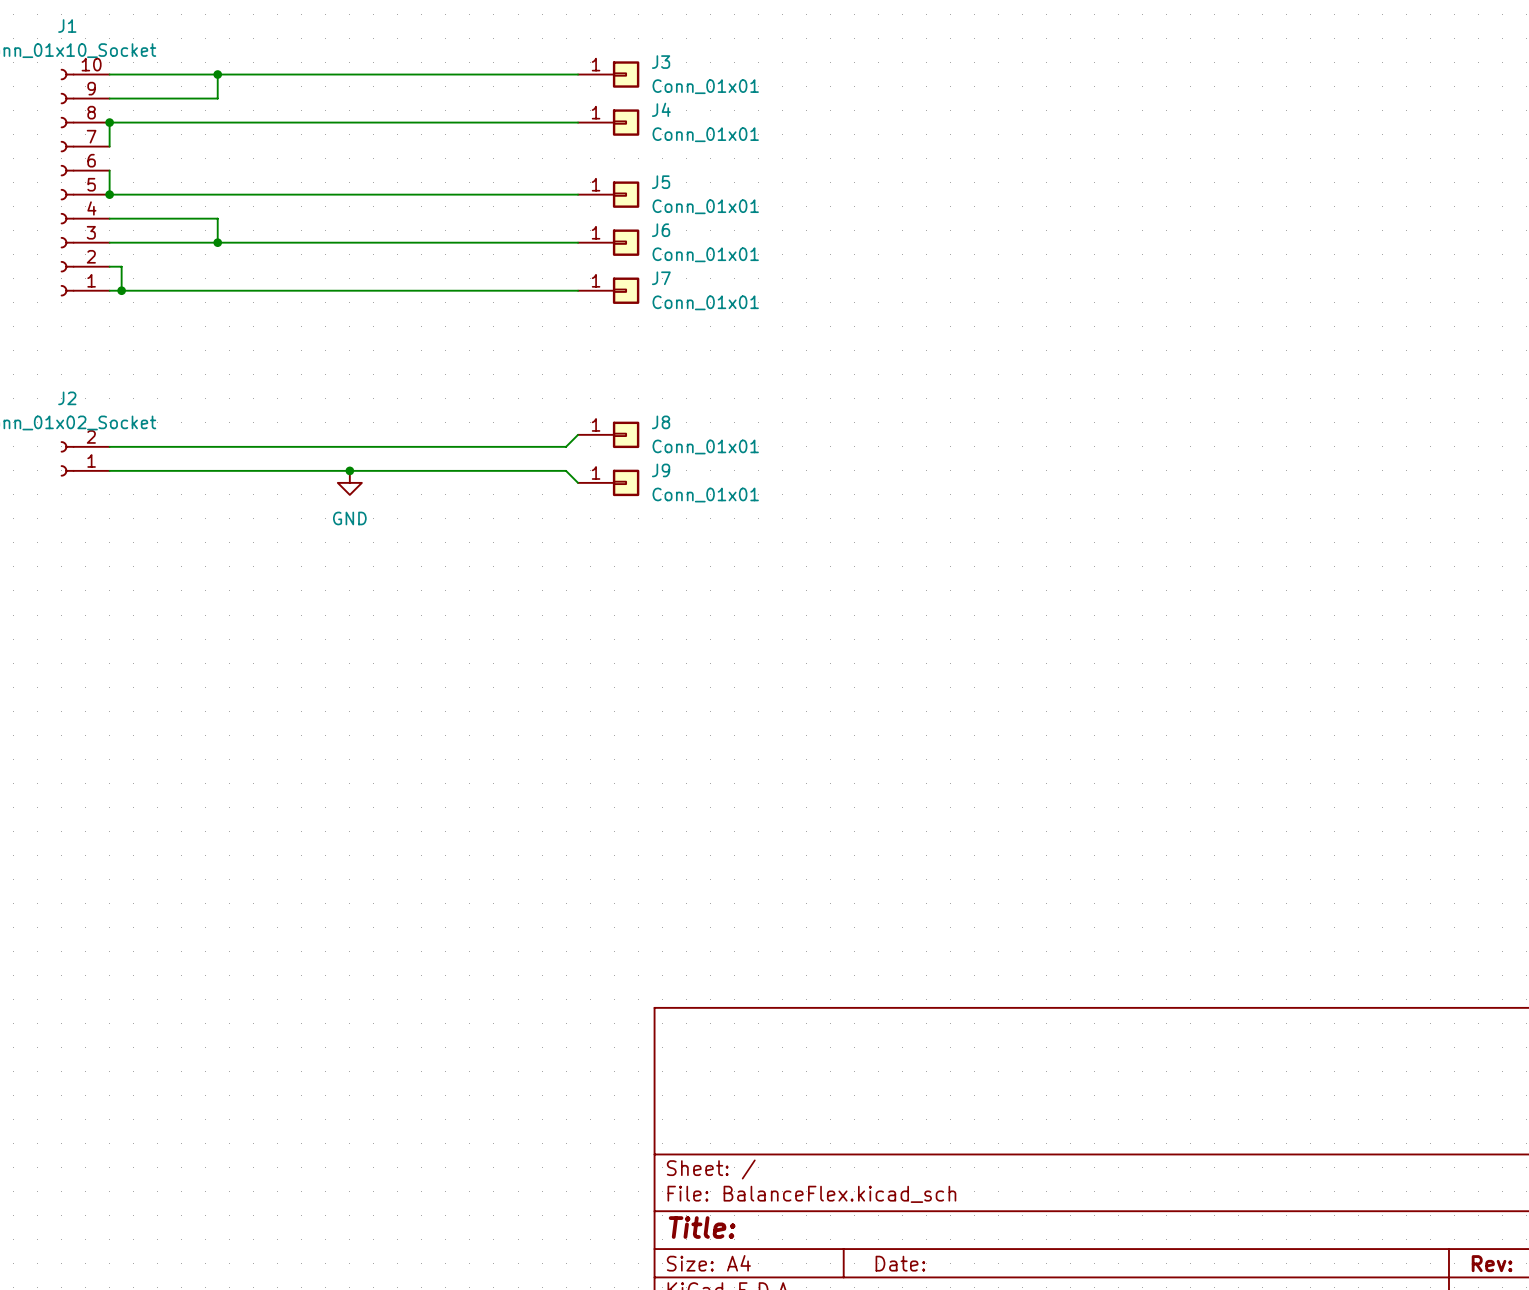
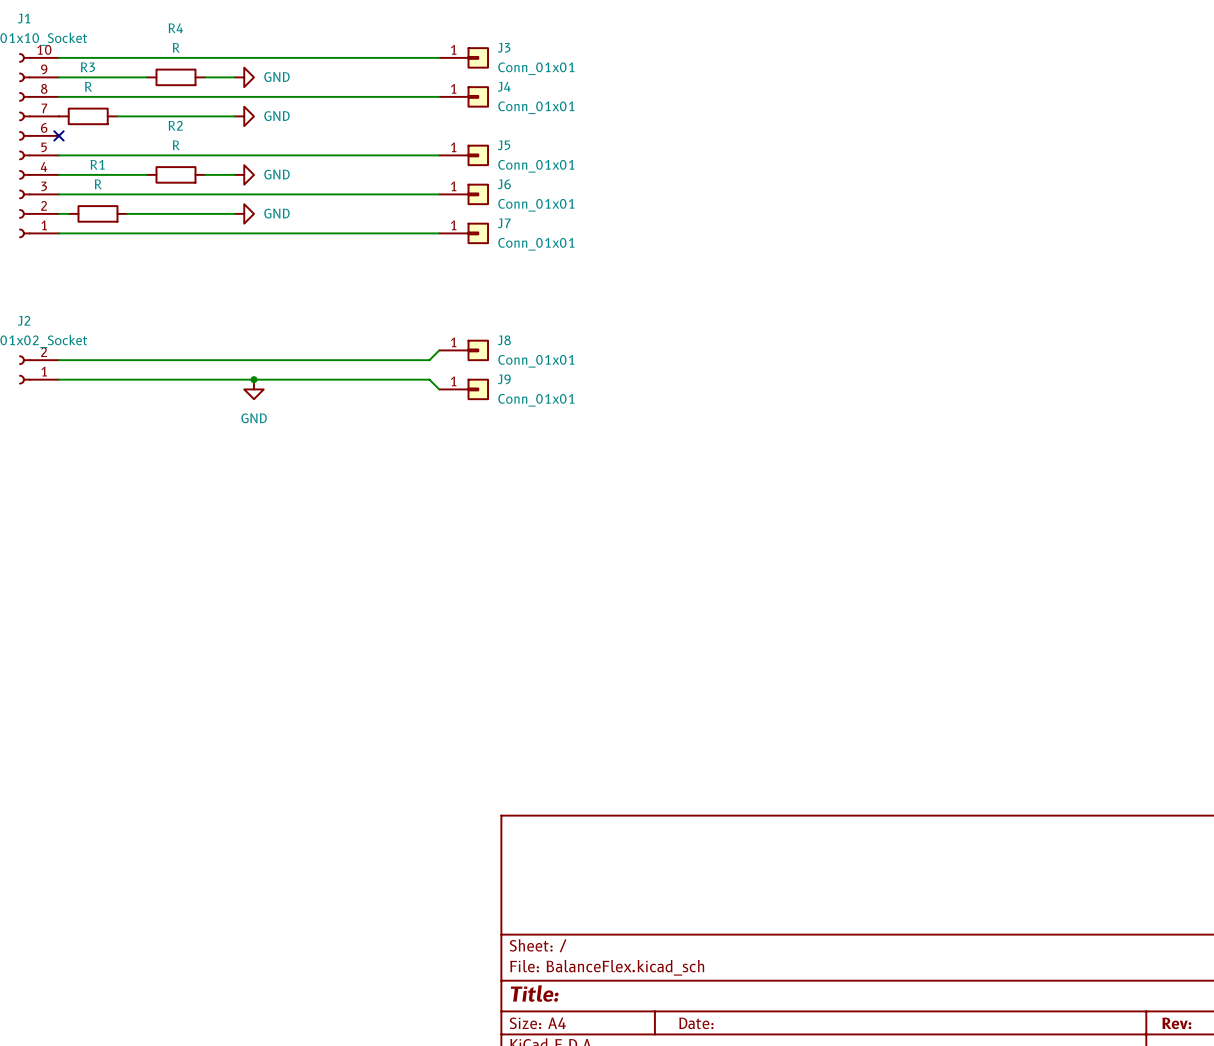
wire: (217, 74) (217, 98) -> none
junction: (217, 74) -> none
R4: none -> R (175, 77)
wire: none -> (205, 77) (234, 77)
power symbol: none -> GND (244, 77)
wire: (109, 122) (109, 146) -> none
junction: (109, 122) -> none
R3: none -> R (88, 116)
wire: none -> (117, 116) (234, 116)
power symbol: none -> GND (244, 116)
wire: (109, 170) (109, 194) -> none
no-connect mark: none -> (58, 135)
junction: (109, 194) -> none
wire: (217, 218) (217, 242) -> none
R2: none -> R (175, 174)
wire: none -> (205, 174) (234, 174)
power symbol: none -> GND (244, 174)
junction: (217, 242) -> none
wire: (121, 266) (121, 290) -> none
R1: none -> R (97, 213)
wire: none -> (127, 213) (234, 213)
power symbol: none -> GND (244, 213)
junction: (121, 290) -> none

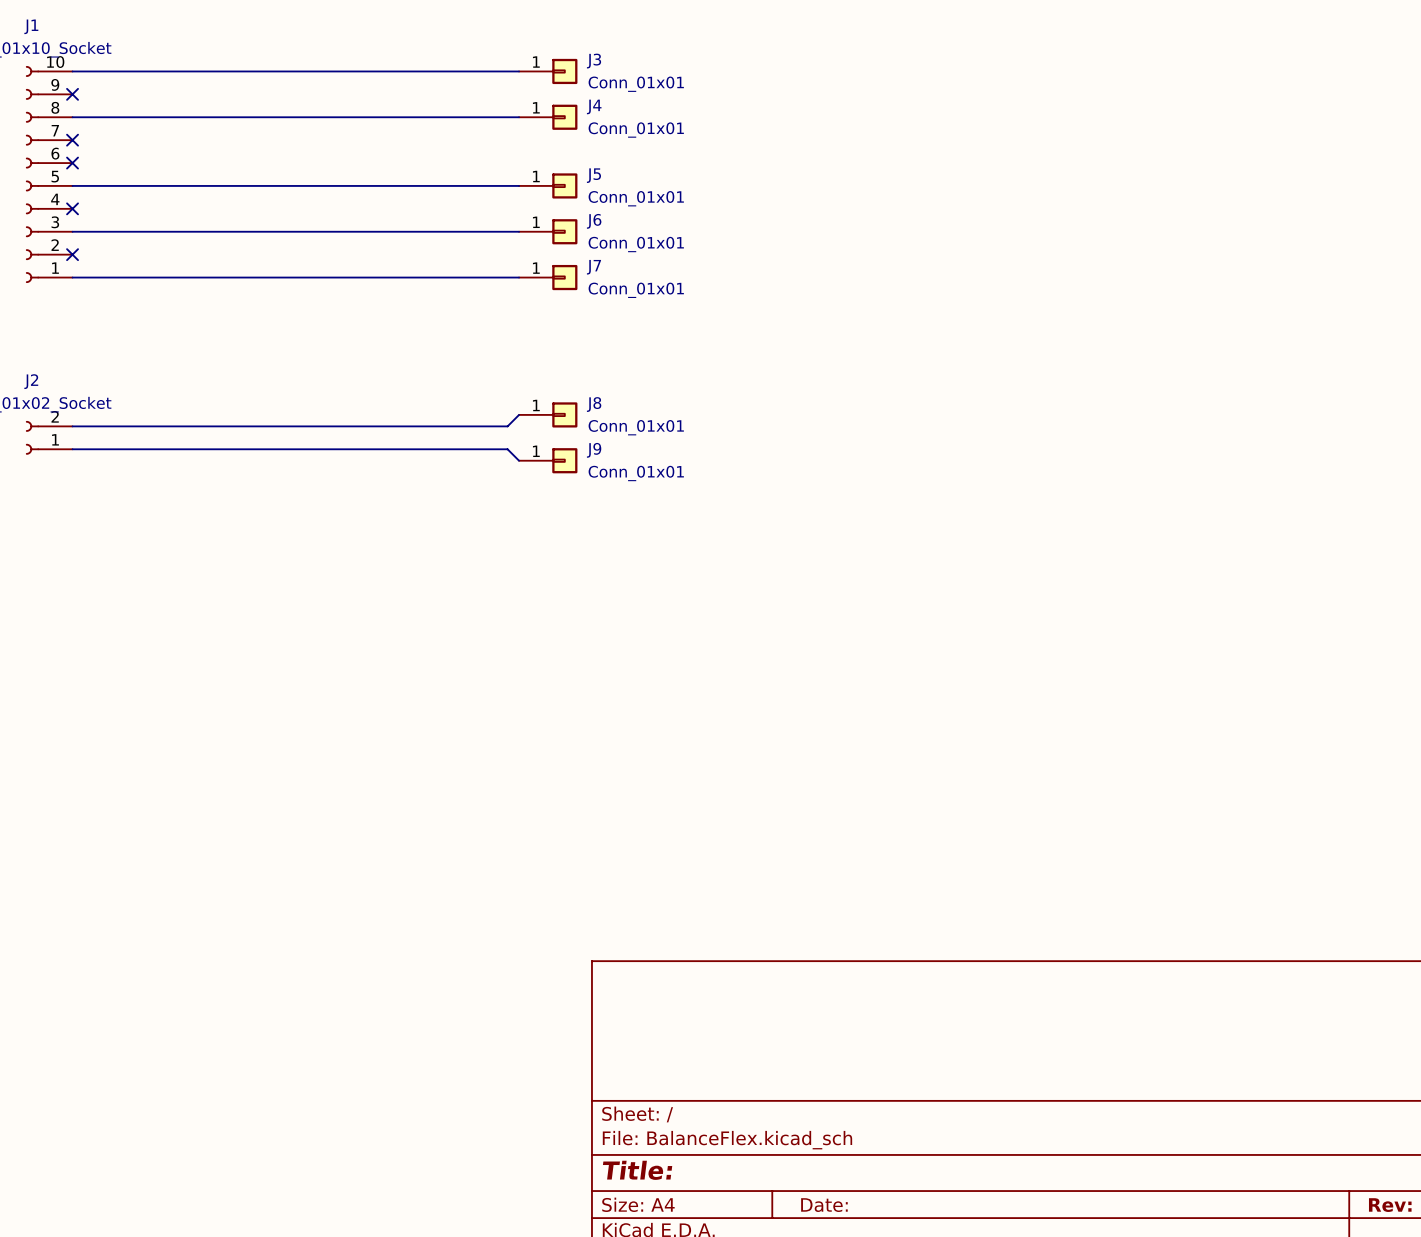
wire: (58, 77) (146, 77) -> none
no-connect mark: none -> (72, 94)
R4: R (175, 77) -> none
wire: (205, 77) (234, 77) -> none
power symbol: GND (244, 77) -> none
no-connect mark: none -> (72, 140)
R3: R (88, 116) -> none
wire: (117, 116) (234, 116) -> none
power symbol: GND (244, 116) -> none
wire: (58, 174) (146, 174) -> none
no-connect mark: none -> (72, 208)
R2: R (175, 174) -> none
wire: (205, 174) (234, 174) -> none
power symbol: GND (244, 174) -> none
wire: (58, 213) (68, 213) -> none
no-connect mark: none -> (72, 254)
R1: R (97, 213) -> none
wire: (127, 213) (234, 213) -> none
power symbol: GND (244, 213) -> none
junction: (253, 379) -> none
power symbol: GND (253, 389) -> none

